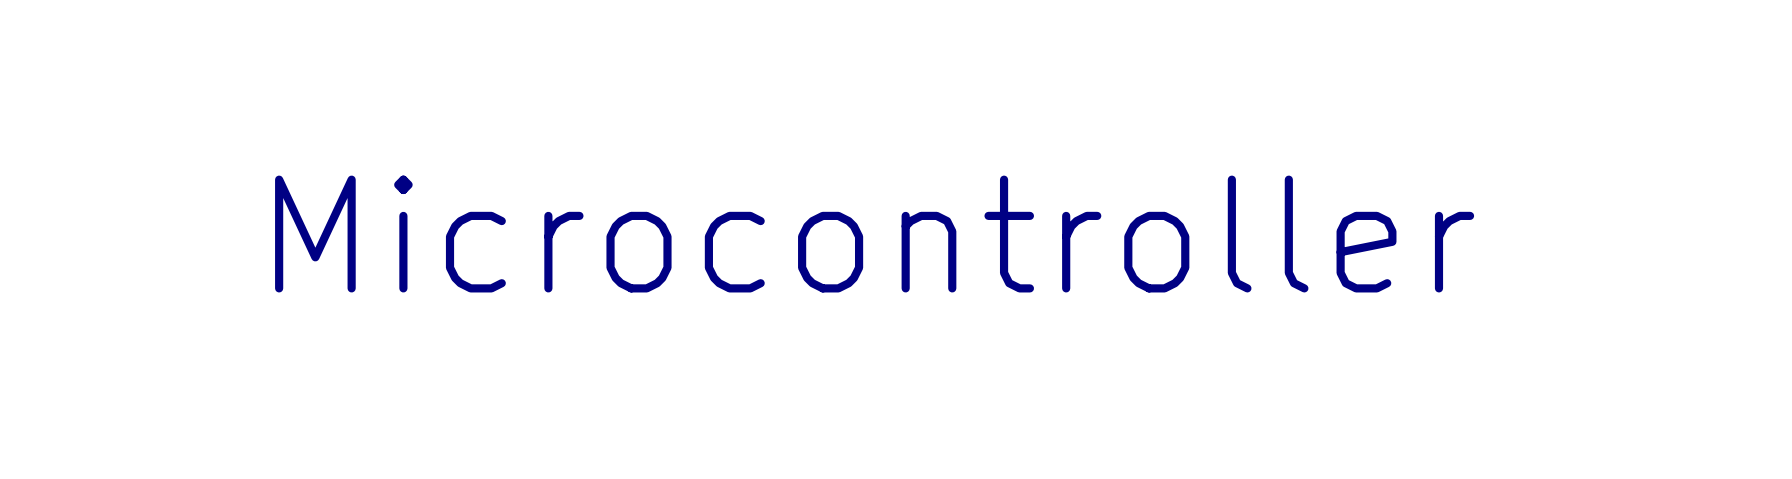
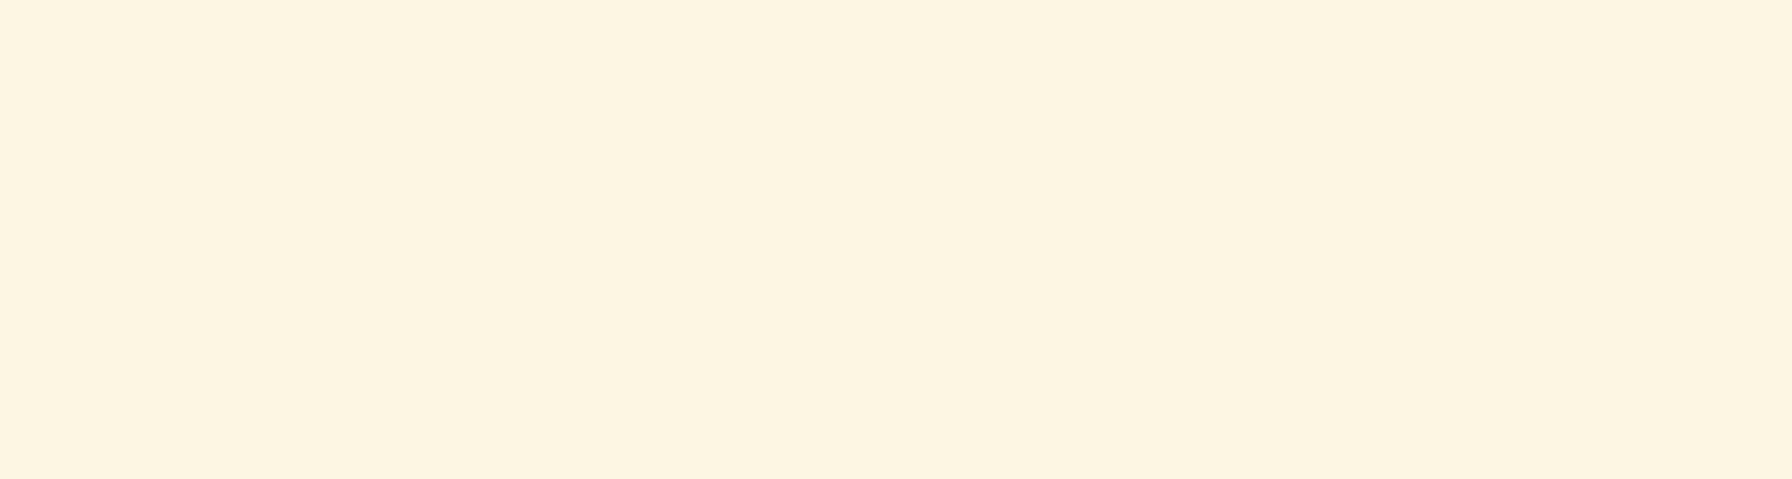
text: Microcontroller (874, 234) -> none

